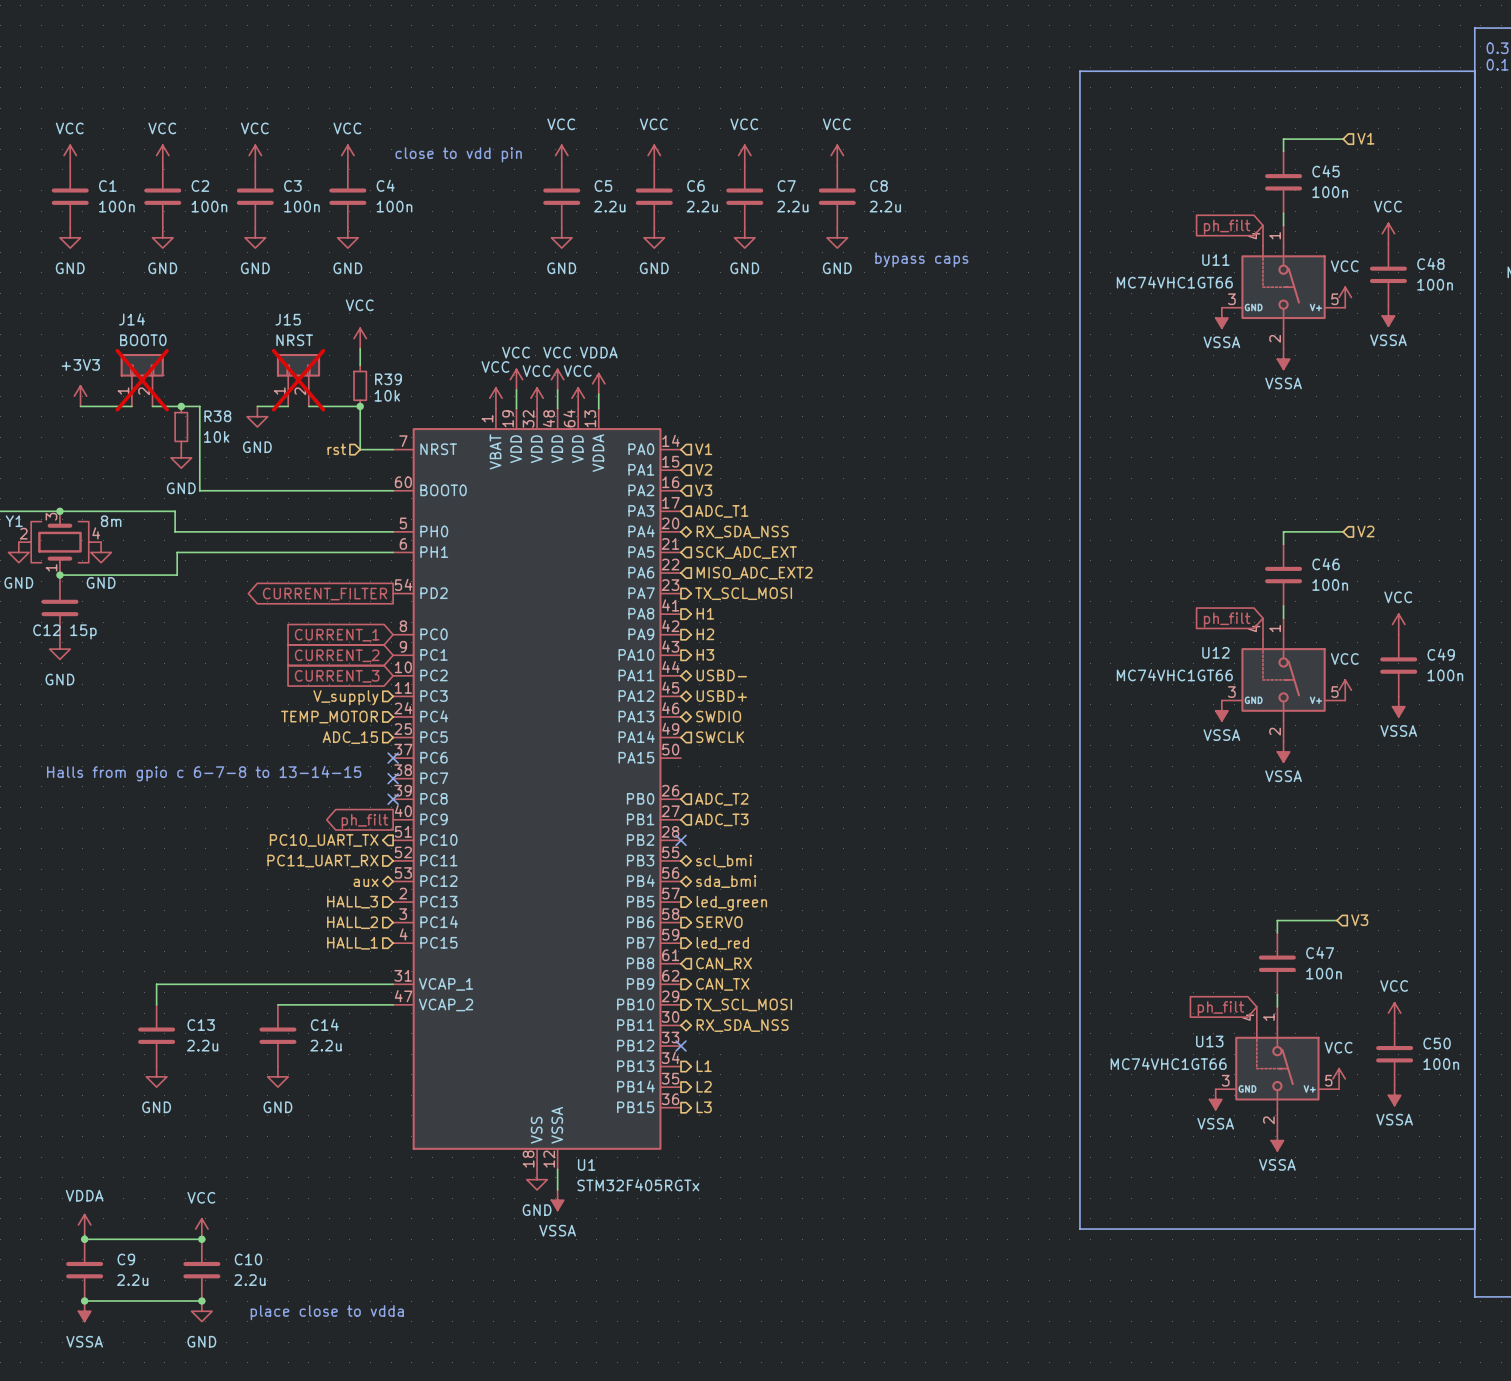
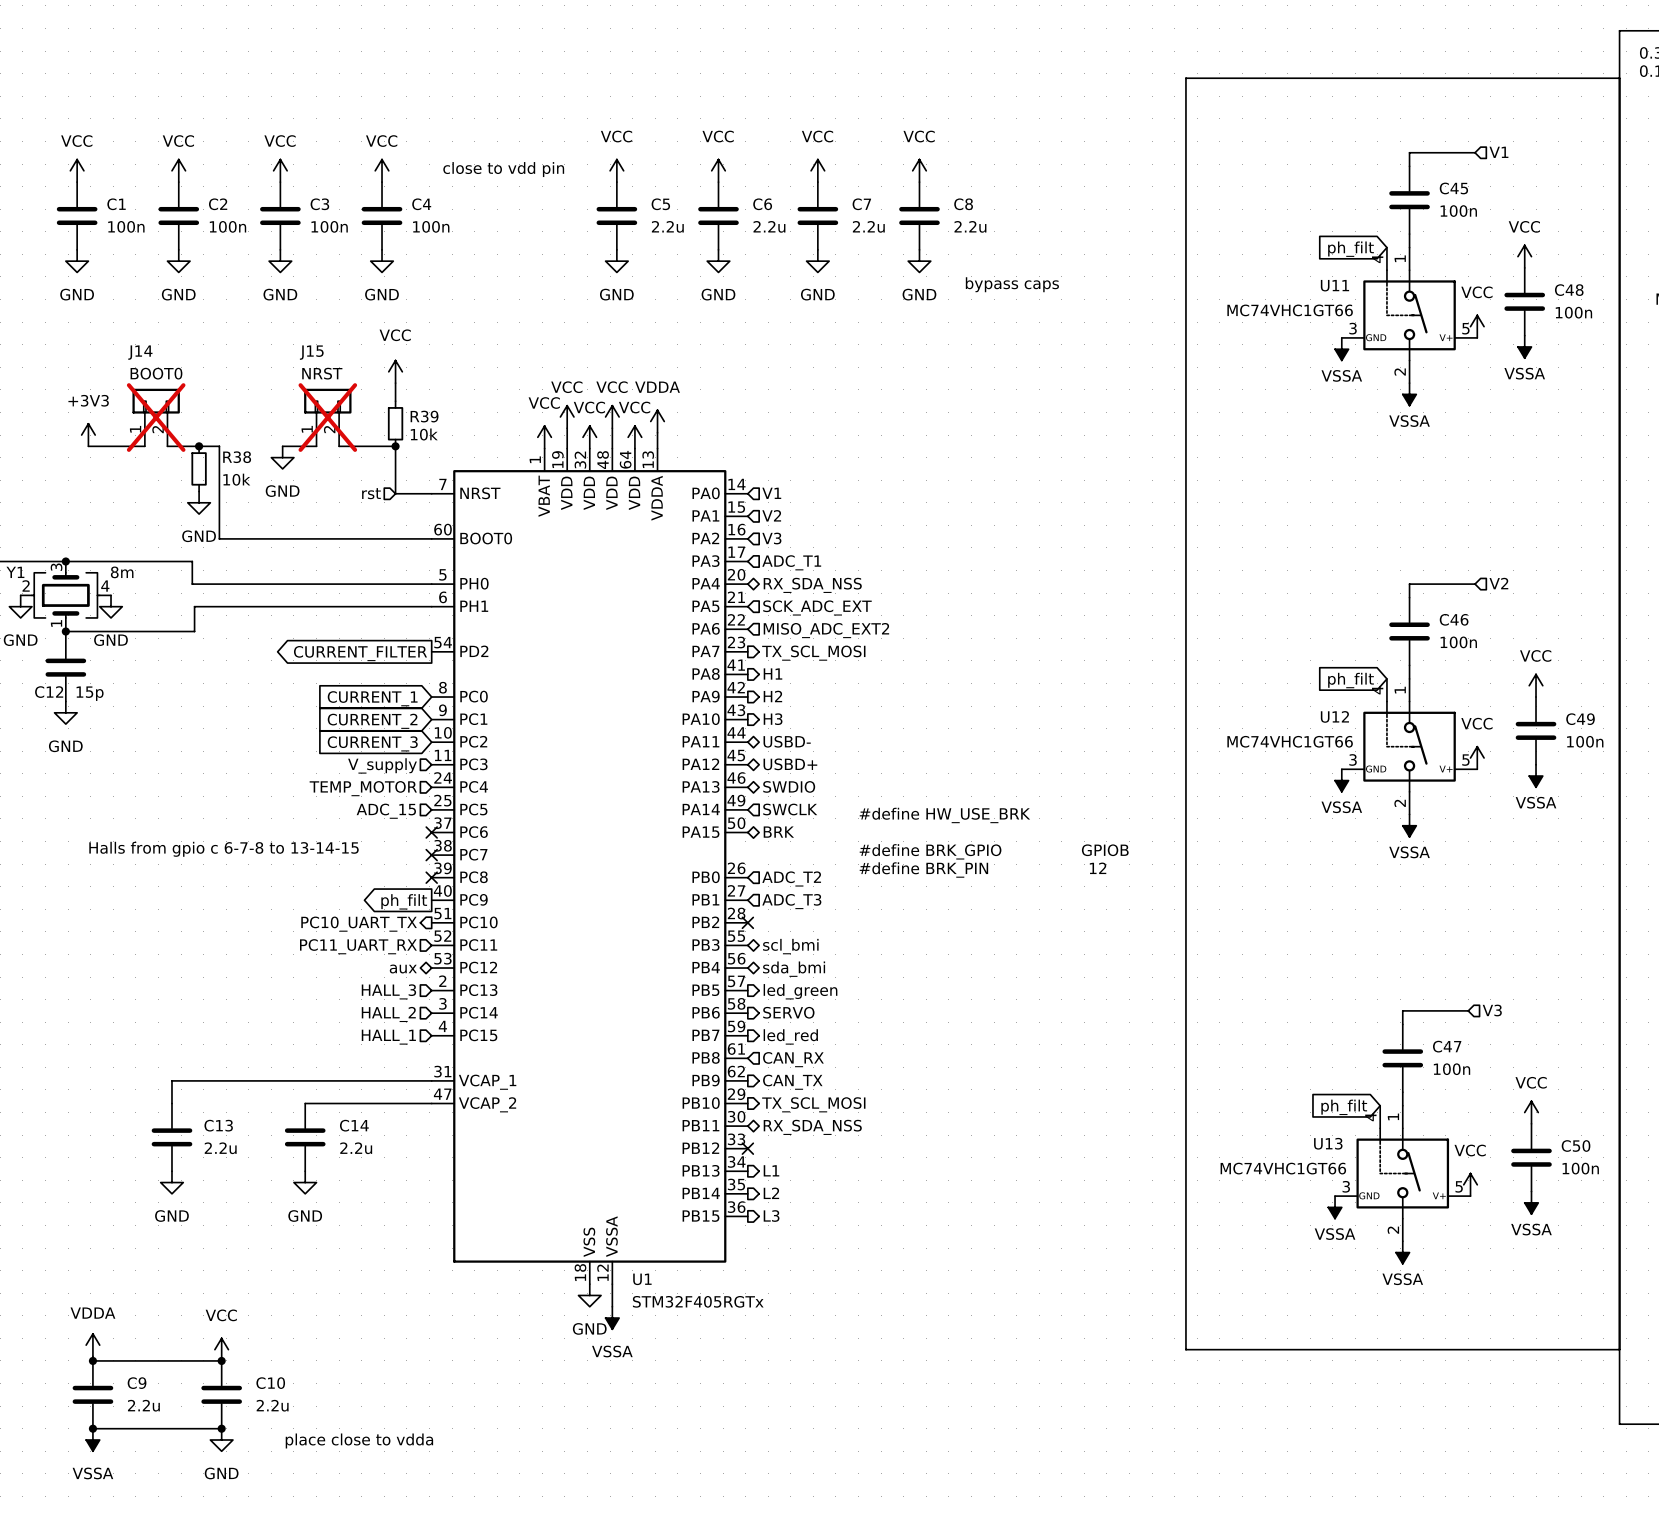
text: none -> #define HW_USE_BRK (944, 815)
hierarchical label: none -> BRK (778, 832)
text: none -> #define BRK_GPIO GPIOB (994, 851)
text: none -> #define BRK_PIN 12 (982, 870)

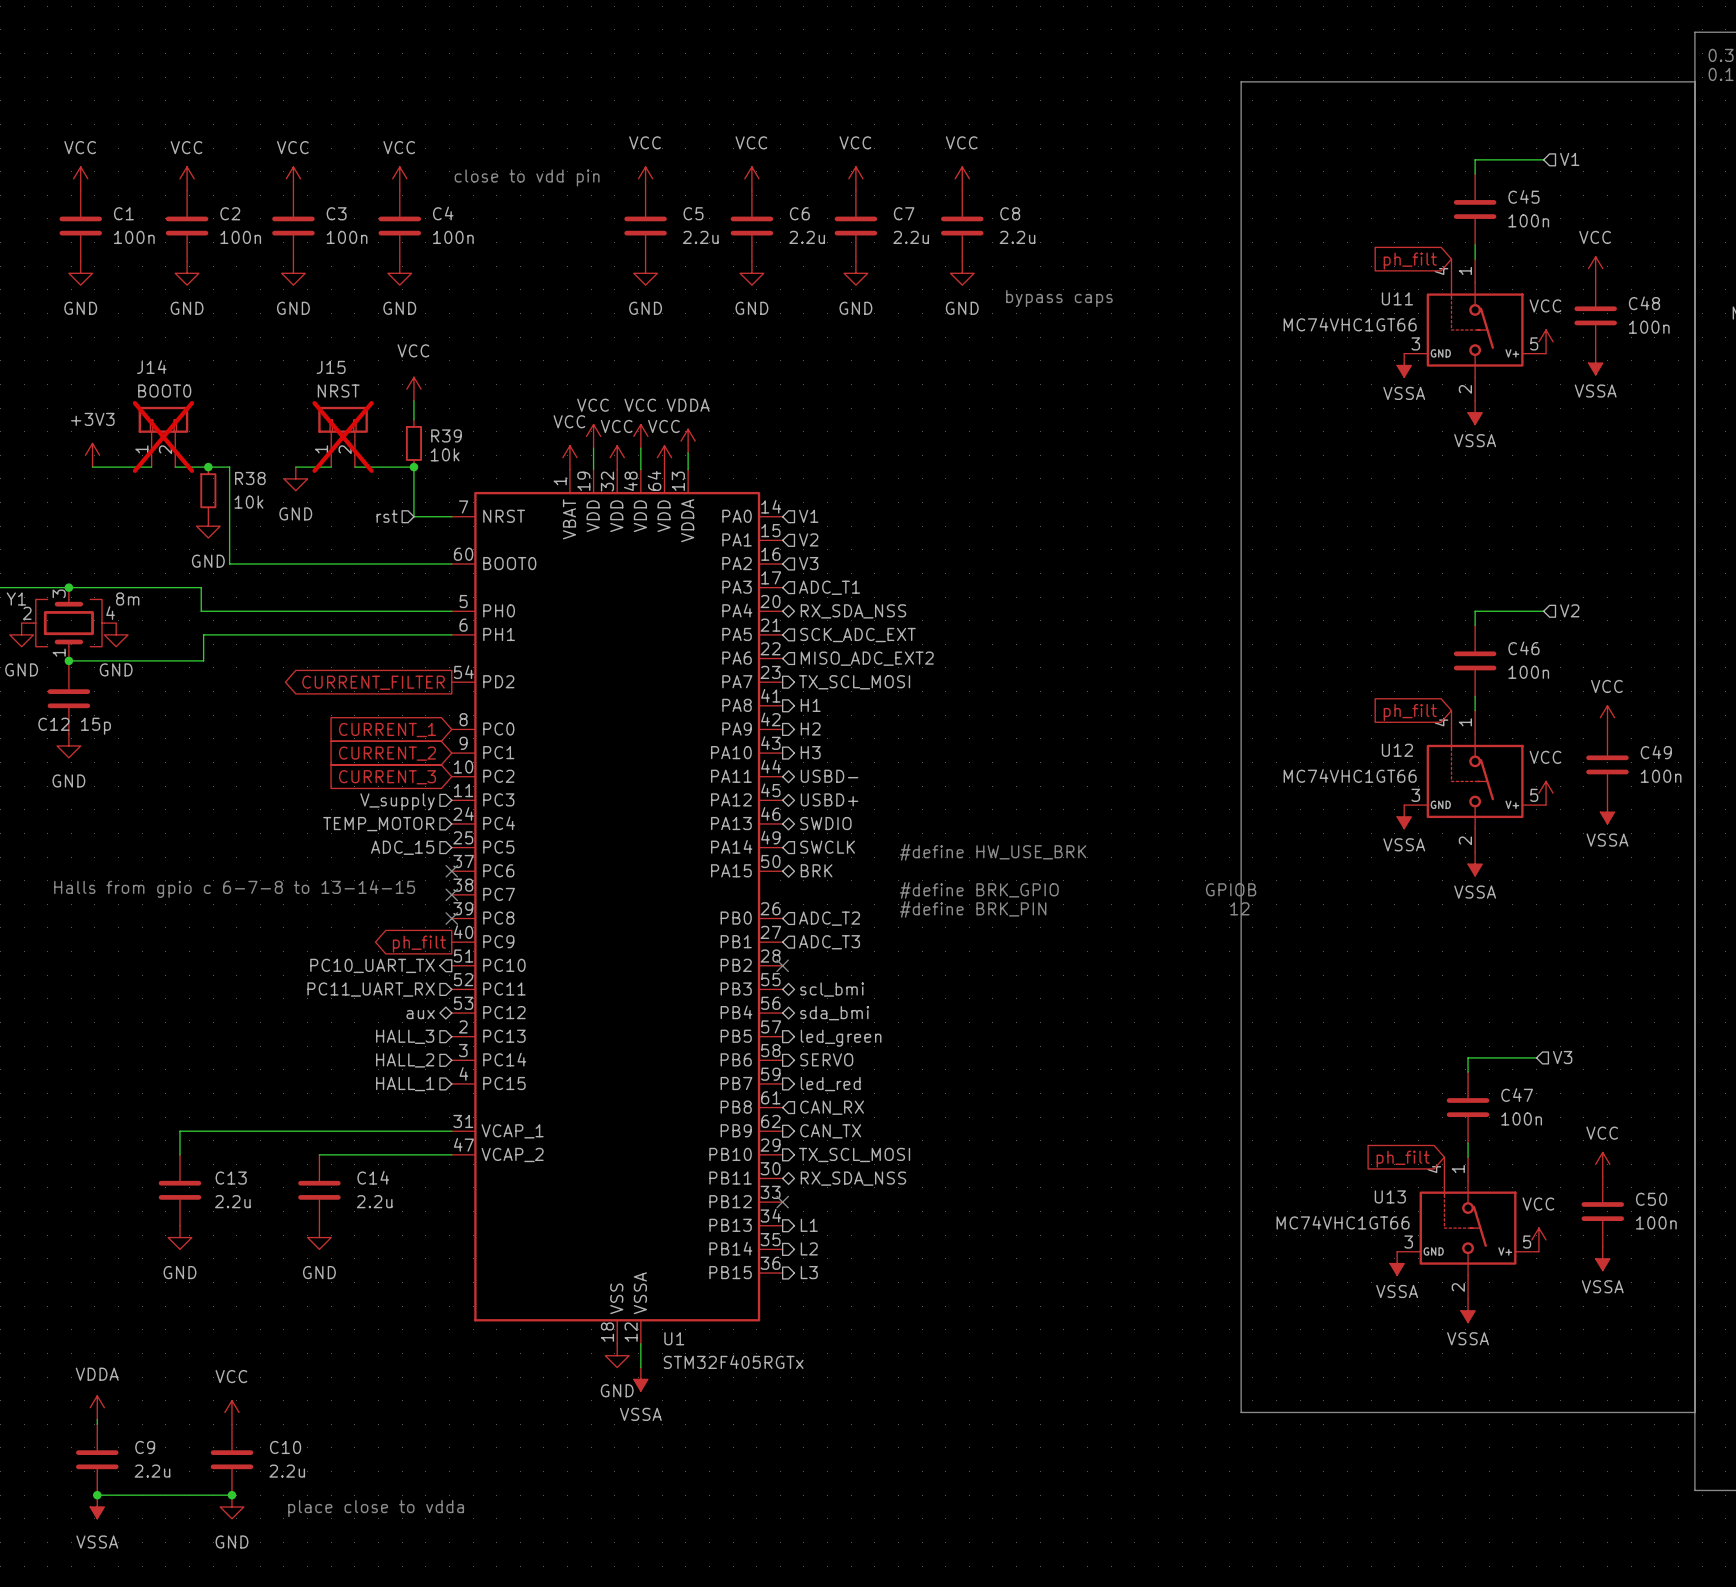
wire: (92, 1360) (221, 1360) -> none
junction: (92, 1360) -> none
junction: (221, 1360) -> none

